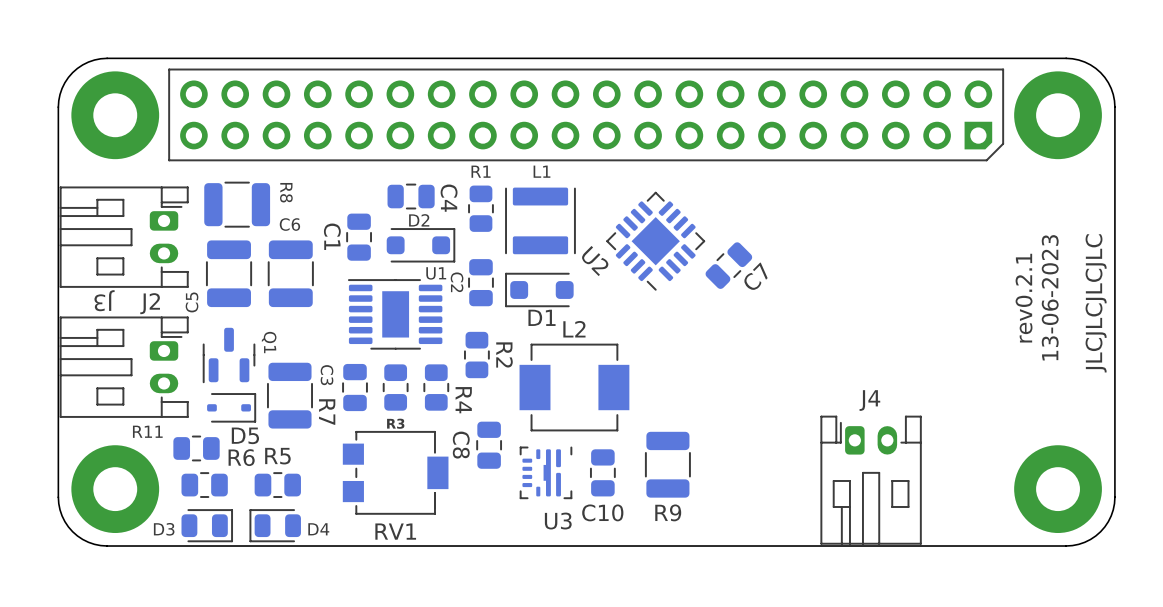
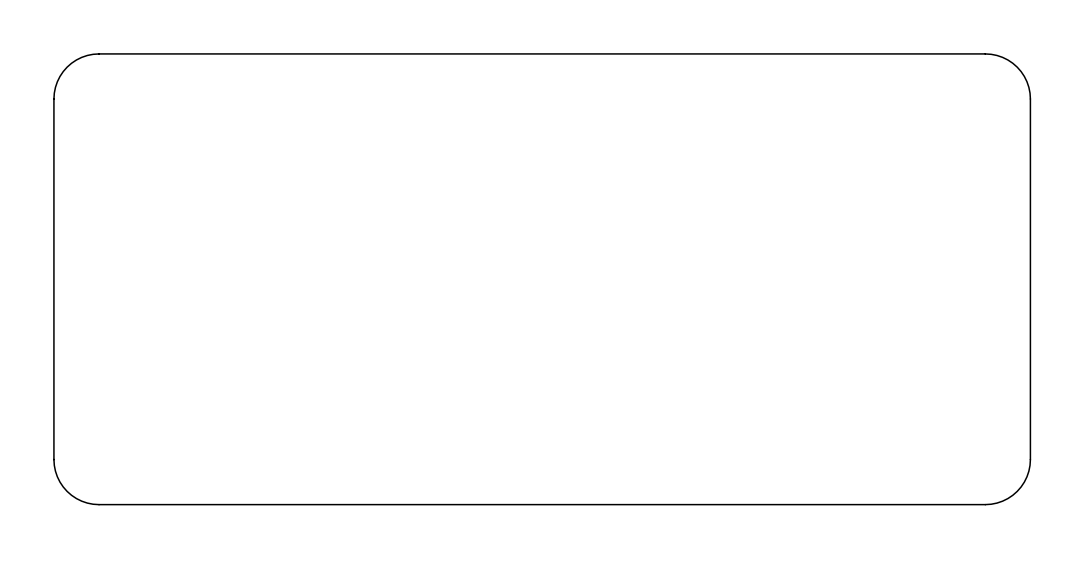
part: (586, 114) -> none
part: (115, 115) -> none
part: (1058, 115) -> none
C4: (411, 196) -> none
R8: (237, 204) -> none
R1: (480, 208) -> none
L1: (540, 220) -> none
J2: (124, 237) -> none
C1: (359, 237) -> none
U2: (655, 241) -> none
D2: (421, 245) -> none
C7: (728, 265) -> none
C5: (229, 273) -> none
C6: (290, 273) -> none
C2: (480, 282) -> none
D1: (539, 289) -> none
text: 13-06-2023 (1050, 297) -> none
text: rev0.2.1 (1024, 298) -> none
text: JLCJLCJLCJLC (1096, 303) -> none
U1: (395, 314) -> none
Q1: (229, 355) -> none
R2: (476, 355) -> none
J3: (124, 367) -> none
C3: (355, 387) -> none
R3: (395, 387) -> none
R4: (436, 387) -> none
L2: (574, 387) -> none
R7: (289, 395) -> none
D5: (231, 407) -> none
C8: (489, 445) -> none
R11: (196, 448) -> none
R9: (667, 464) -> none
RV1: (395, 472) -> none
U3: (546, 472) -> none
C10: (602, 472) -> none
J4: (871, 480) -> none
R6: (204, 485) -> none
R5: (277, 485) -> none
part: (115, 489) -> none
part: (1058, 489) -> none
D3: (207, 525) -> none
D4: (275, 525) -> none

